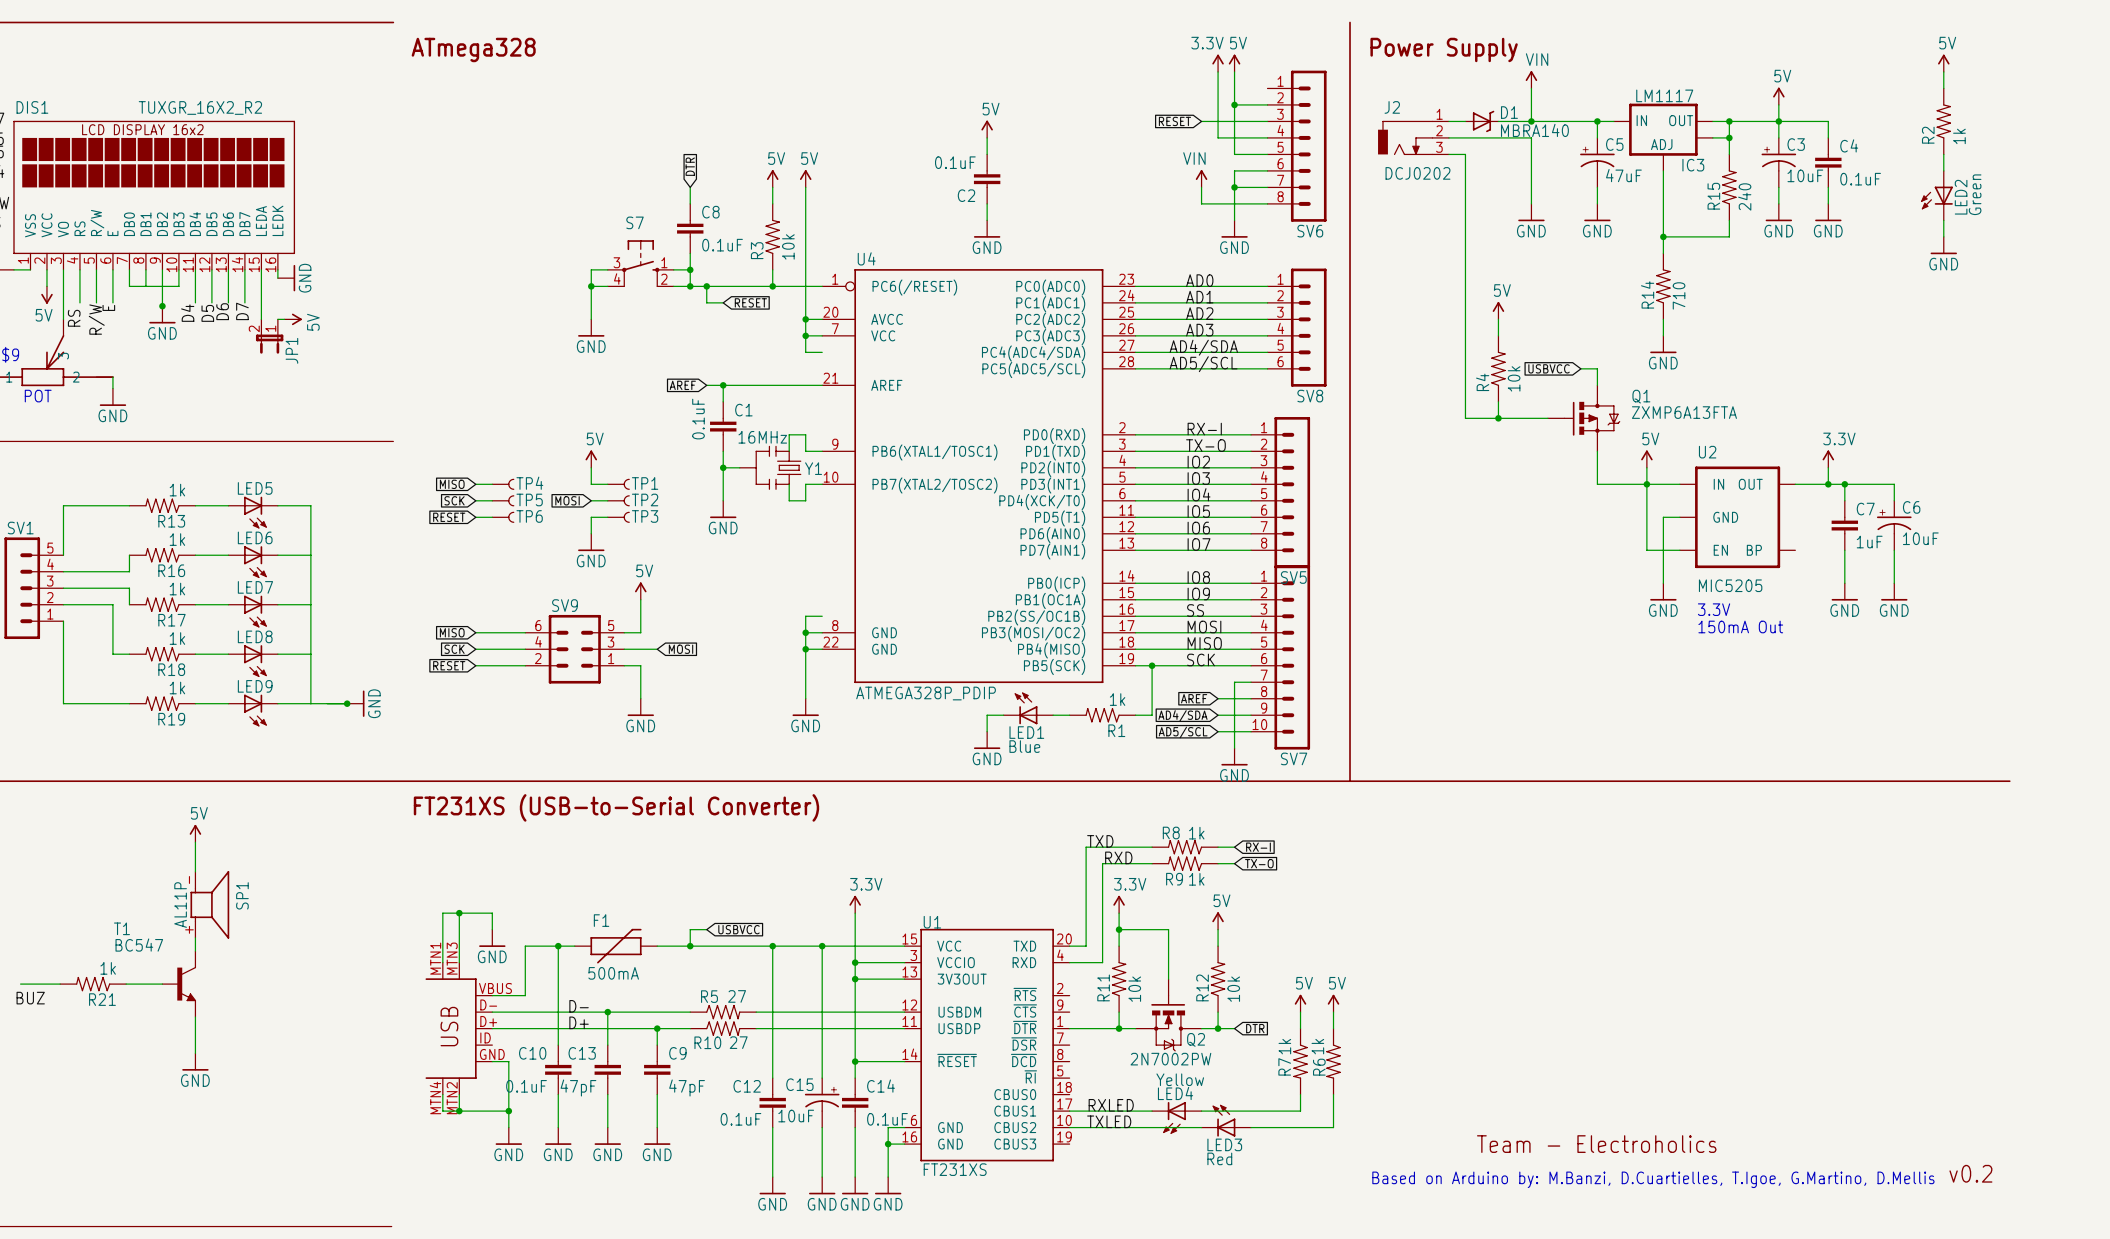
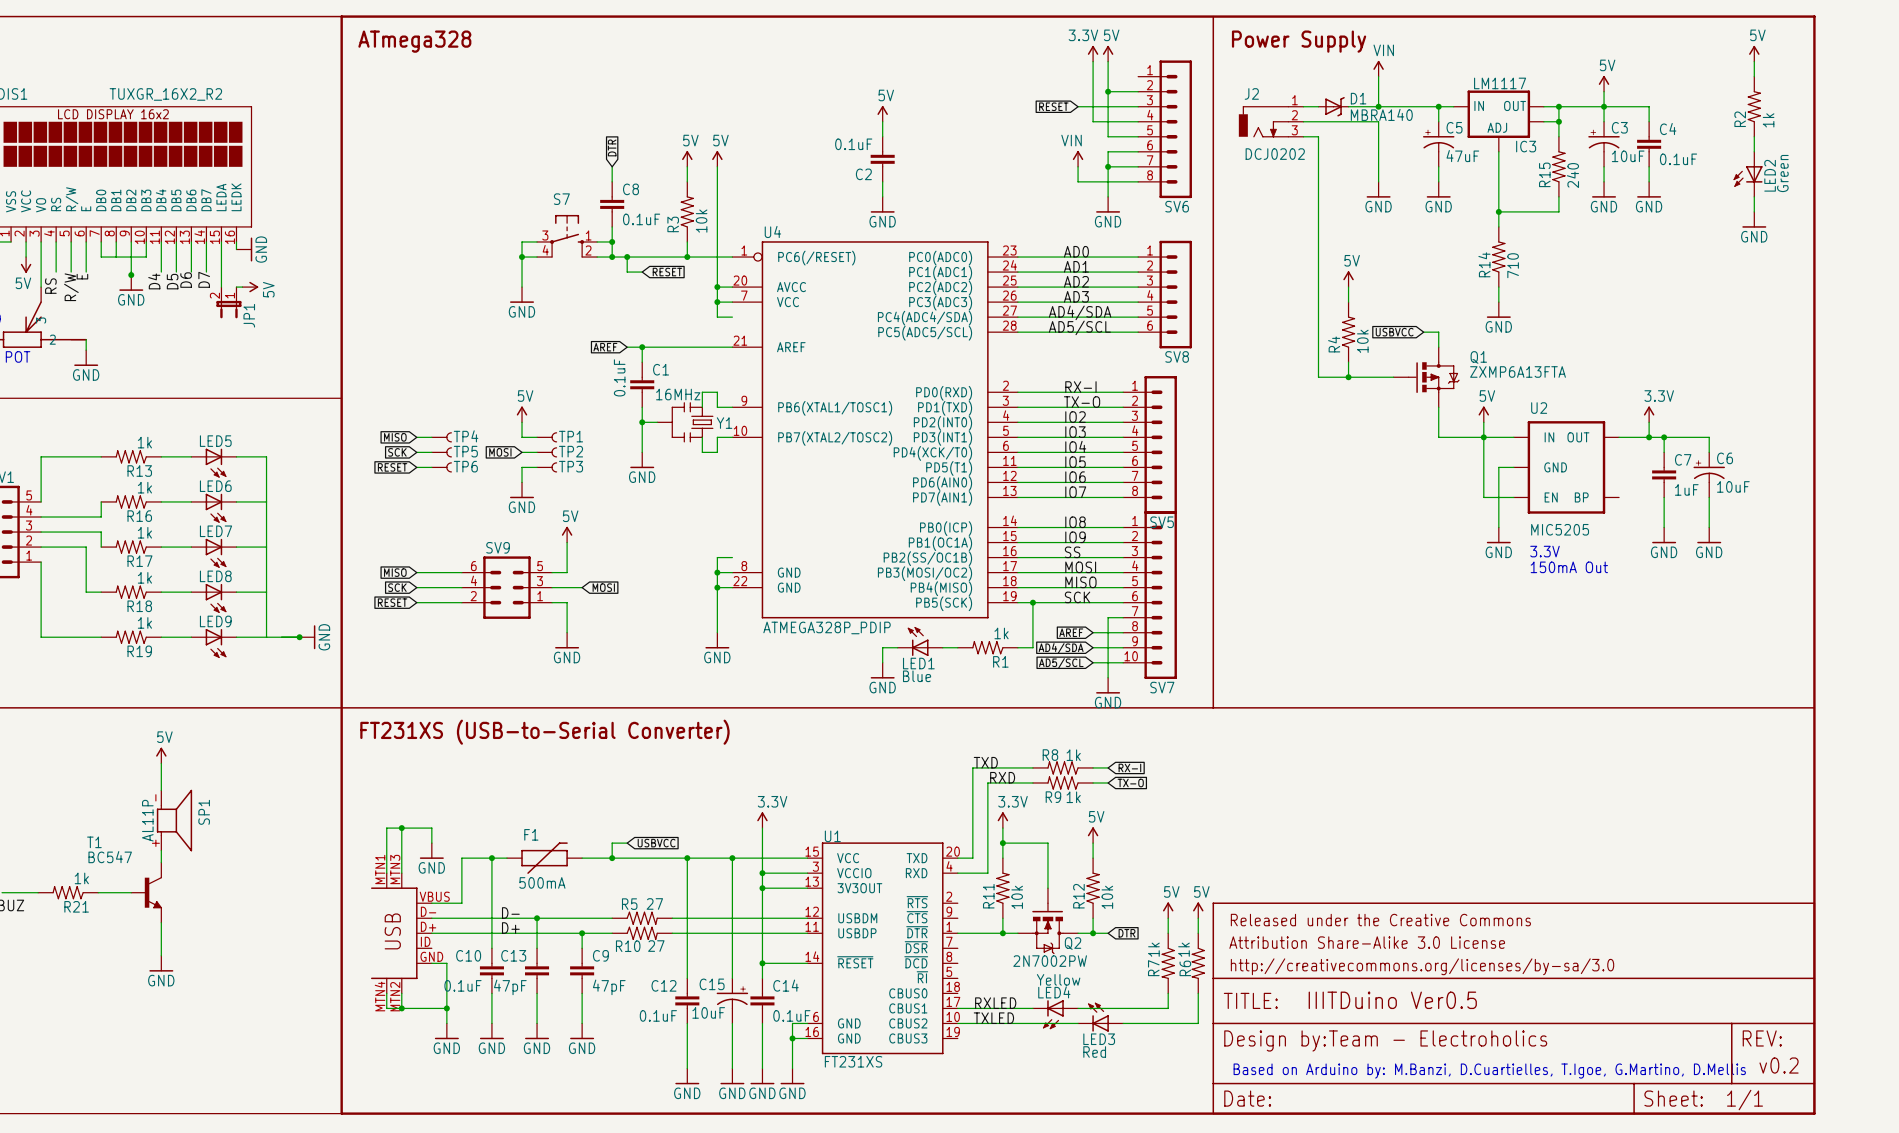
part: none -> (1078, 565)
part: none -> (1513, 1008)

